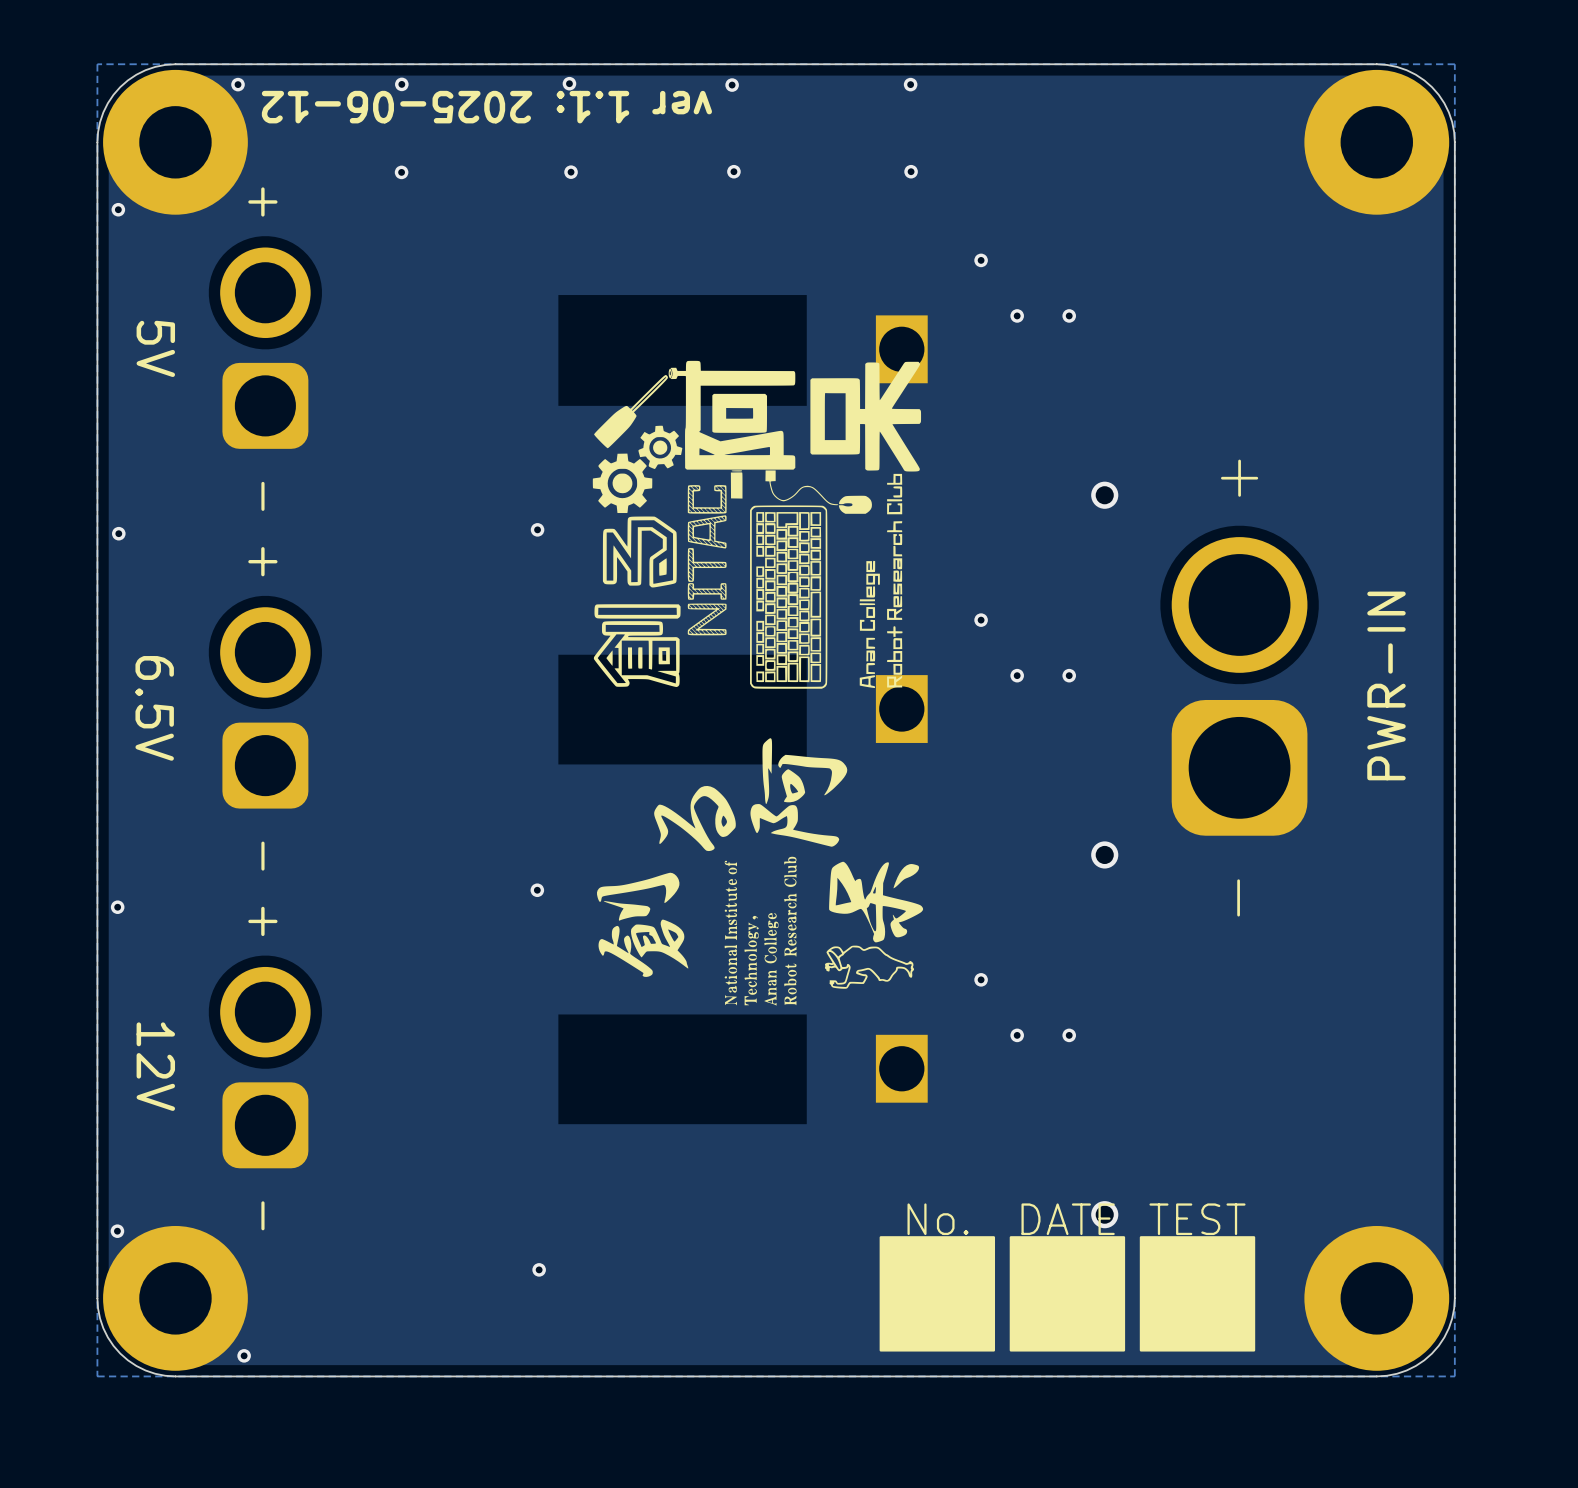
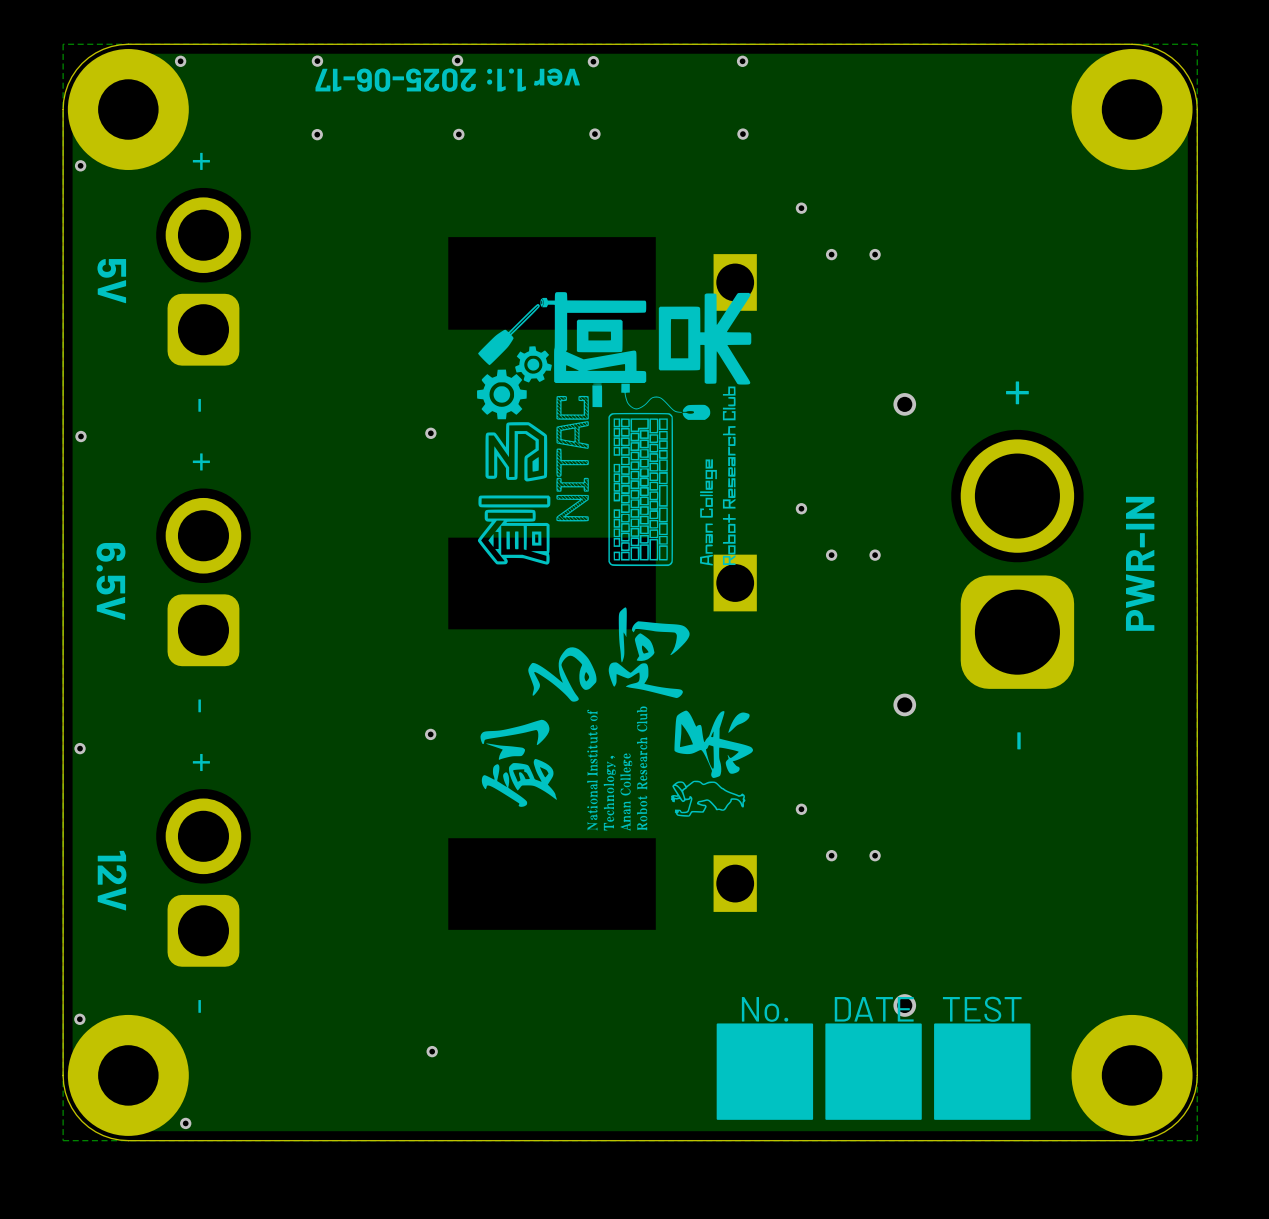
text: ver 1.1: 2025-06-12 (486, 107) -> ver 1.1: 2025-06-17 (447, 80)

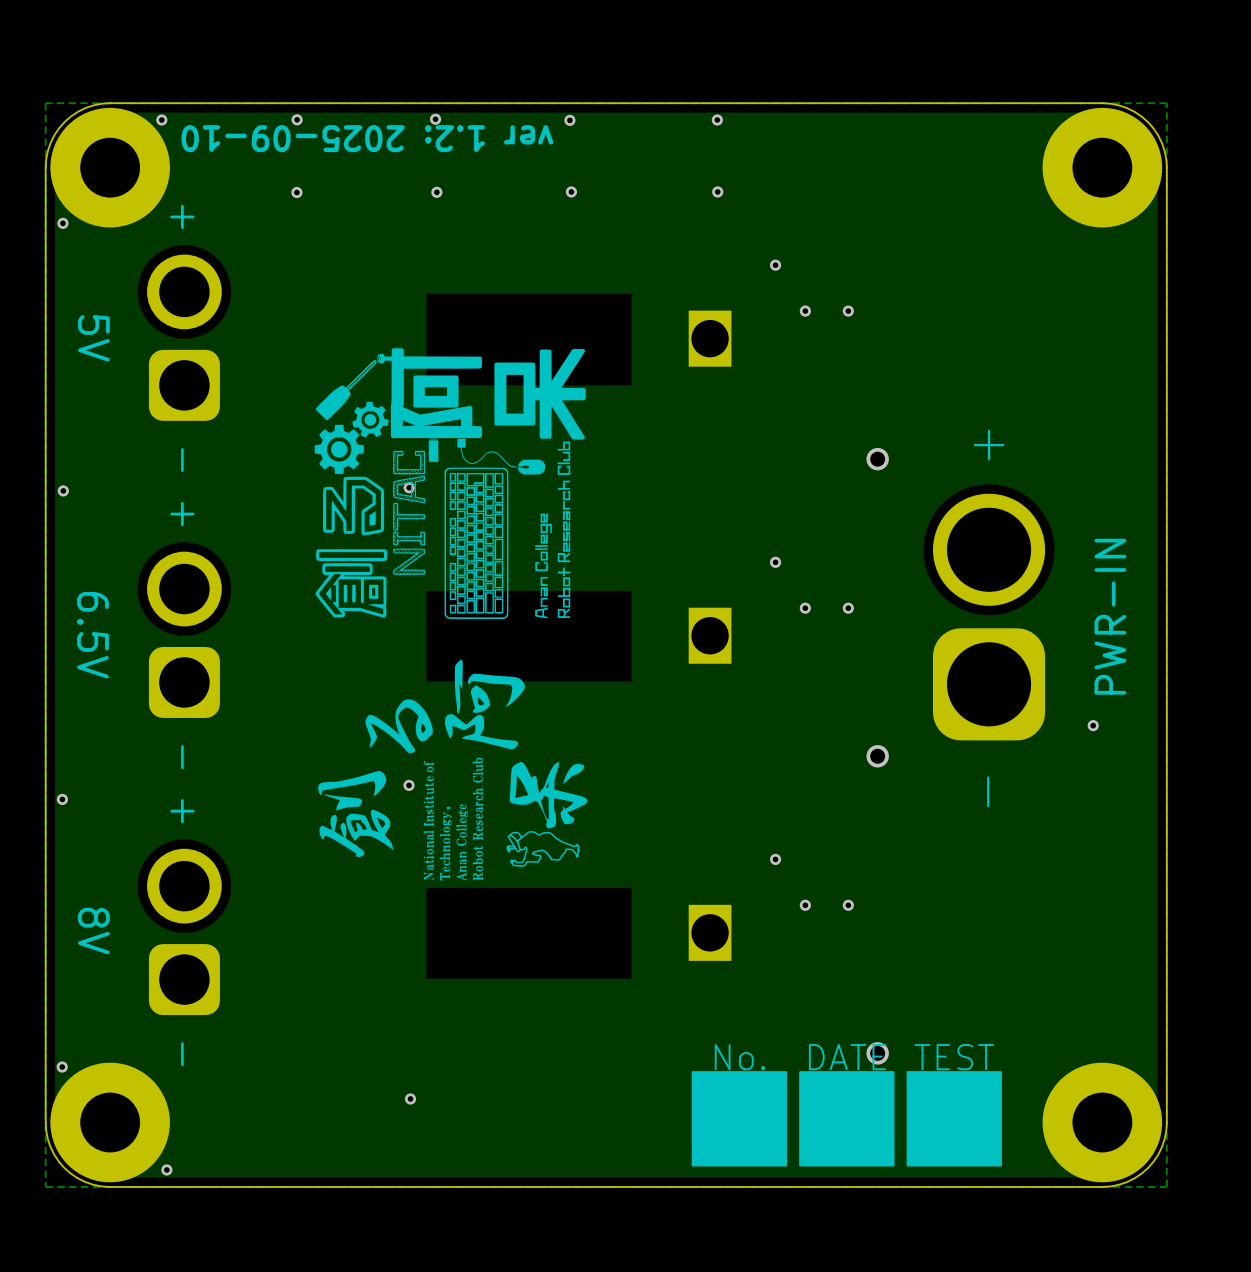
text: ver 1.1: 2025-06-17 (447, 80) -> ver 1.2: 2025-09-10 (367, 138)
drawing position: (614, 429) -> (450, 483)
via: none -> (1093, 725)
drawing position: (616, 719) -> (452, 770)
text: 12V (112, 880) -> 8V (93, 931)

